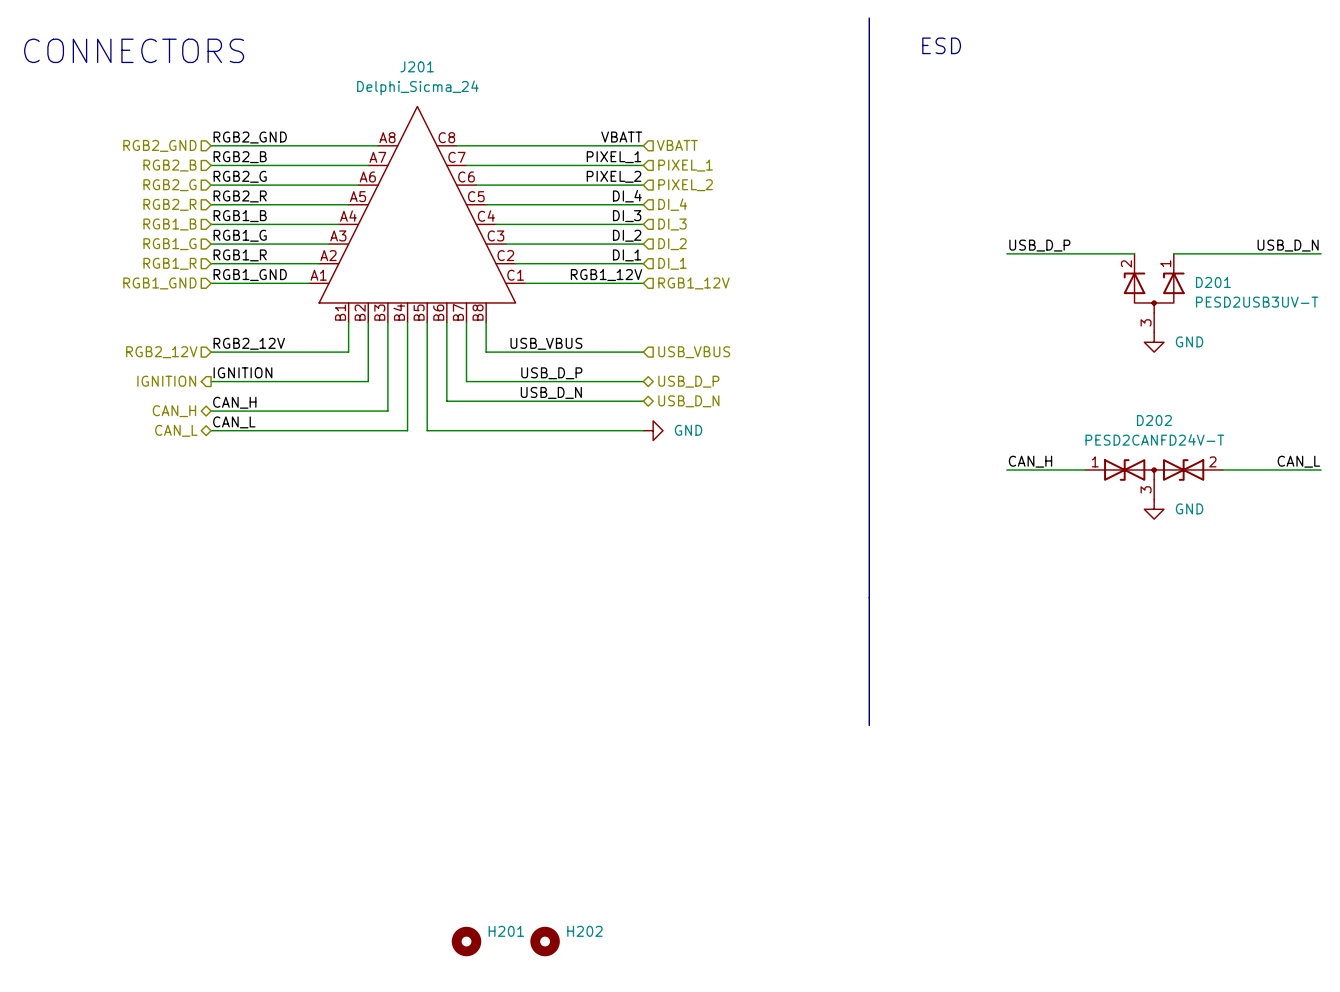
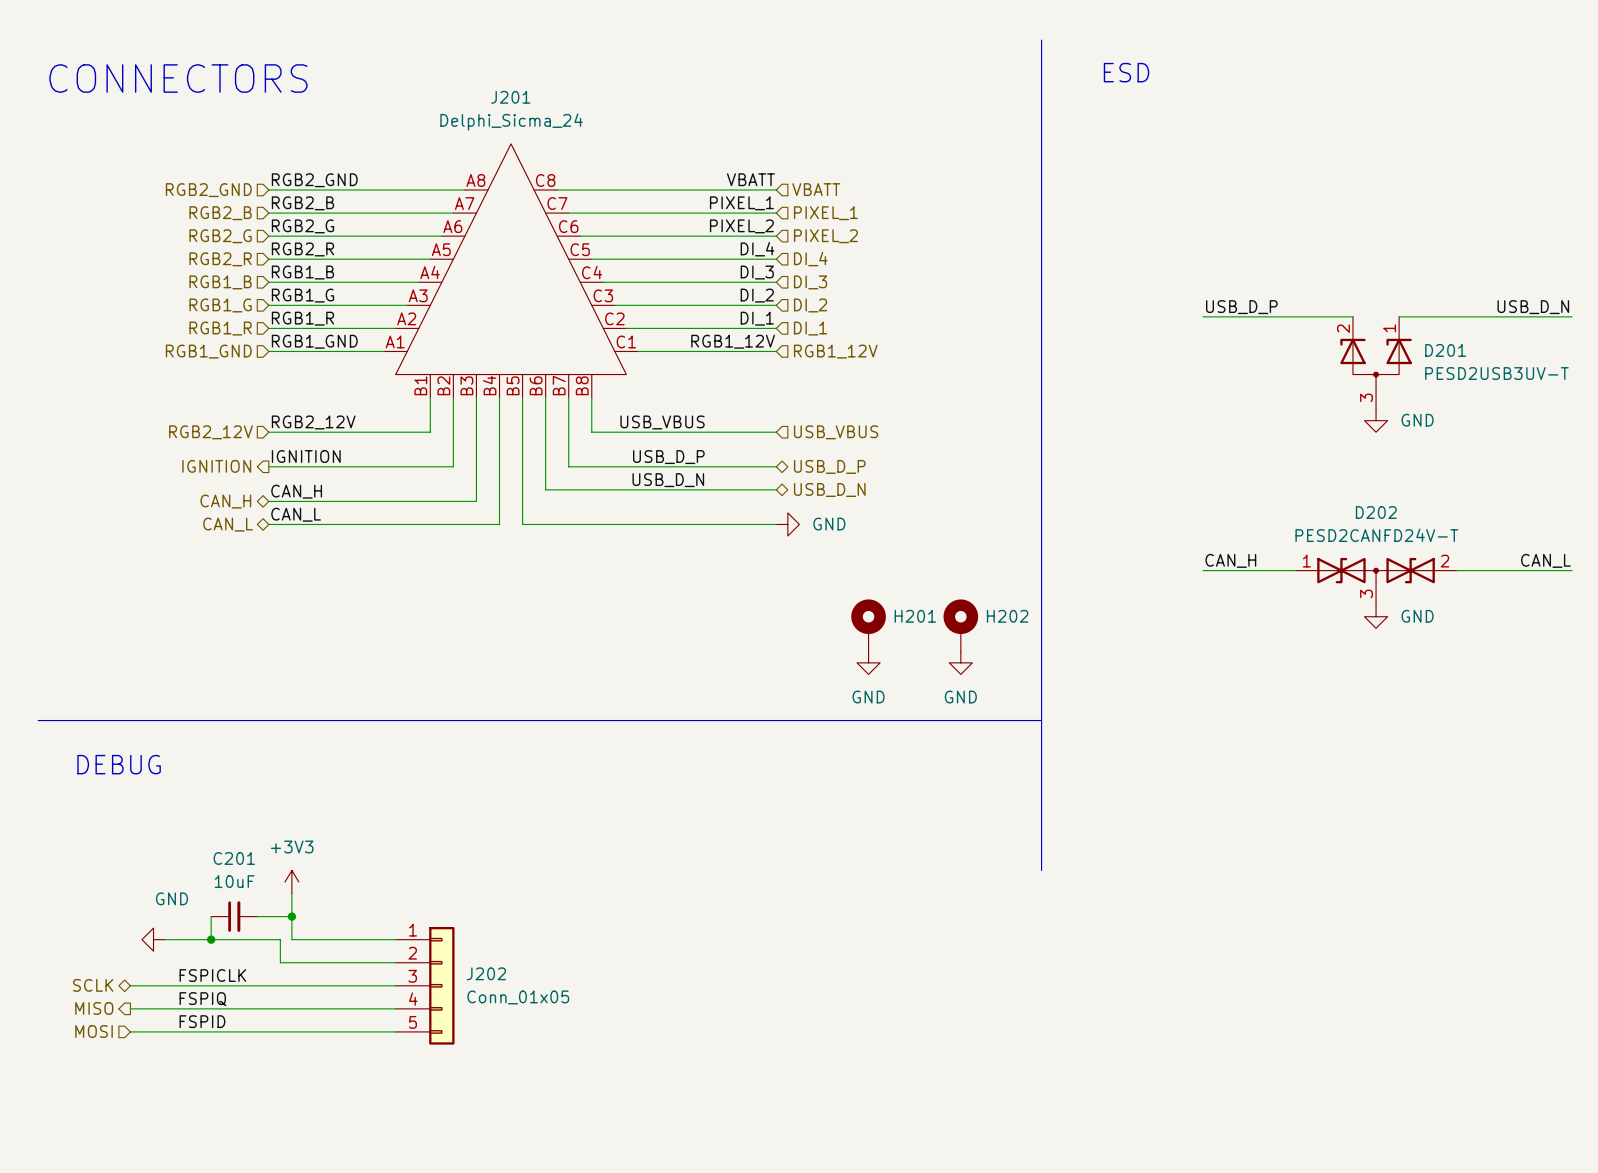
power symbol: none -> GND (868, 662)
power symbol: none -> GND (960, 662)
line: none -> (38, 720) (1041, 720)
text: none -> DEBUG (119, 764)
power symbol: none -> +3V3 (291, 882)
wire: none -> (291, 893) (291, 939) (395, 939)
wire: none -> (211, 916) (211, 939)
C201: none -> 10uF (234, 916)
wire: none -> (257, 916) (291, 916)
junction: none -> (291, 916)
power symbol: none -> GND (153, 939)
wire: none -> (165, 939) (280, 939) (280, 962) (395, 962)
junction: none -> (211, 939)
label: none -> FSPICLK (212, 975)
hierarchical label: none -> SCLK (93, 985)
wire: none -> (130, 985) (395, 985)
J202: none -> Conn_01x05 (425, 985)
label: none -> FSPIQ (203, 999)
hierarchical label: none -> MISO (94, 1008)
wire: none -> (130, 1008) (395, 1008)
label: none -> FSPID (202, 1021)
hierarchical label: none -> MOSI (94, 1031)
wire: none -> (130, 1031) (395, 1031)
H201 symbol: [451, 926, 482, 957] -> [851, 599, 886, 652]
H202 symbol: [530, 926, 560, 957] -> [943, 599, 979, 652]

